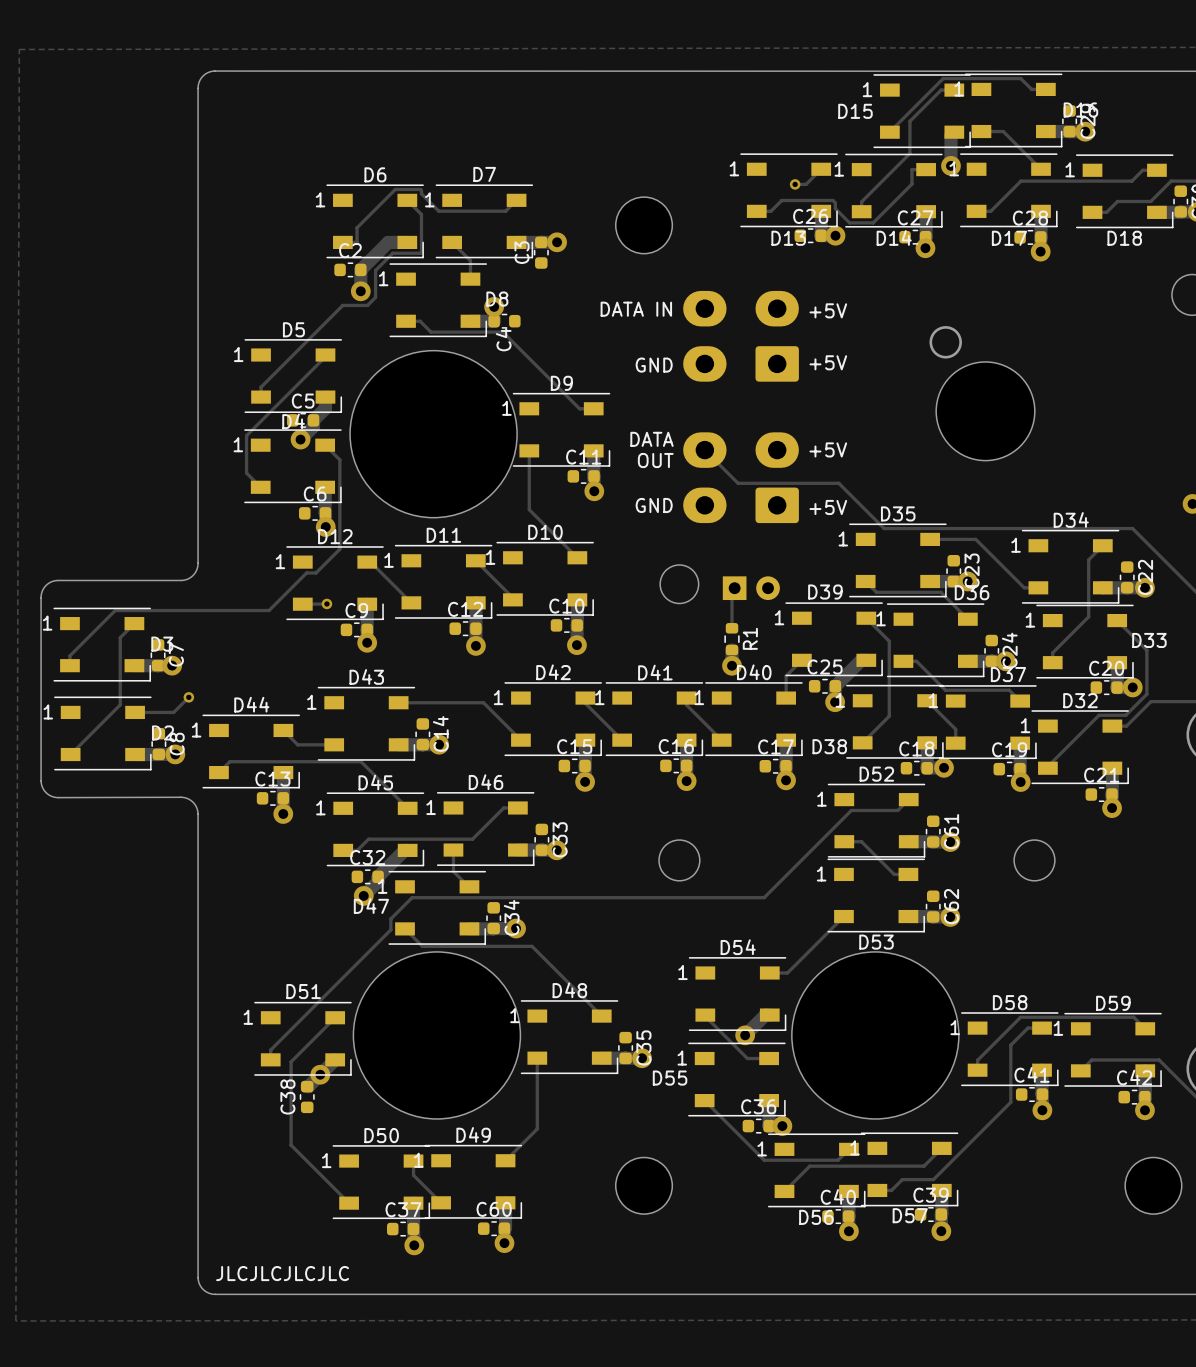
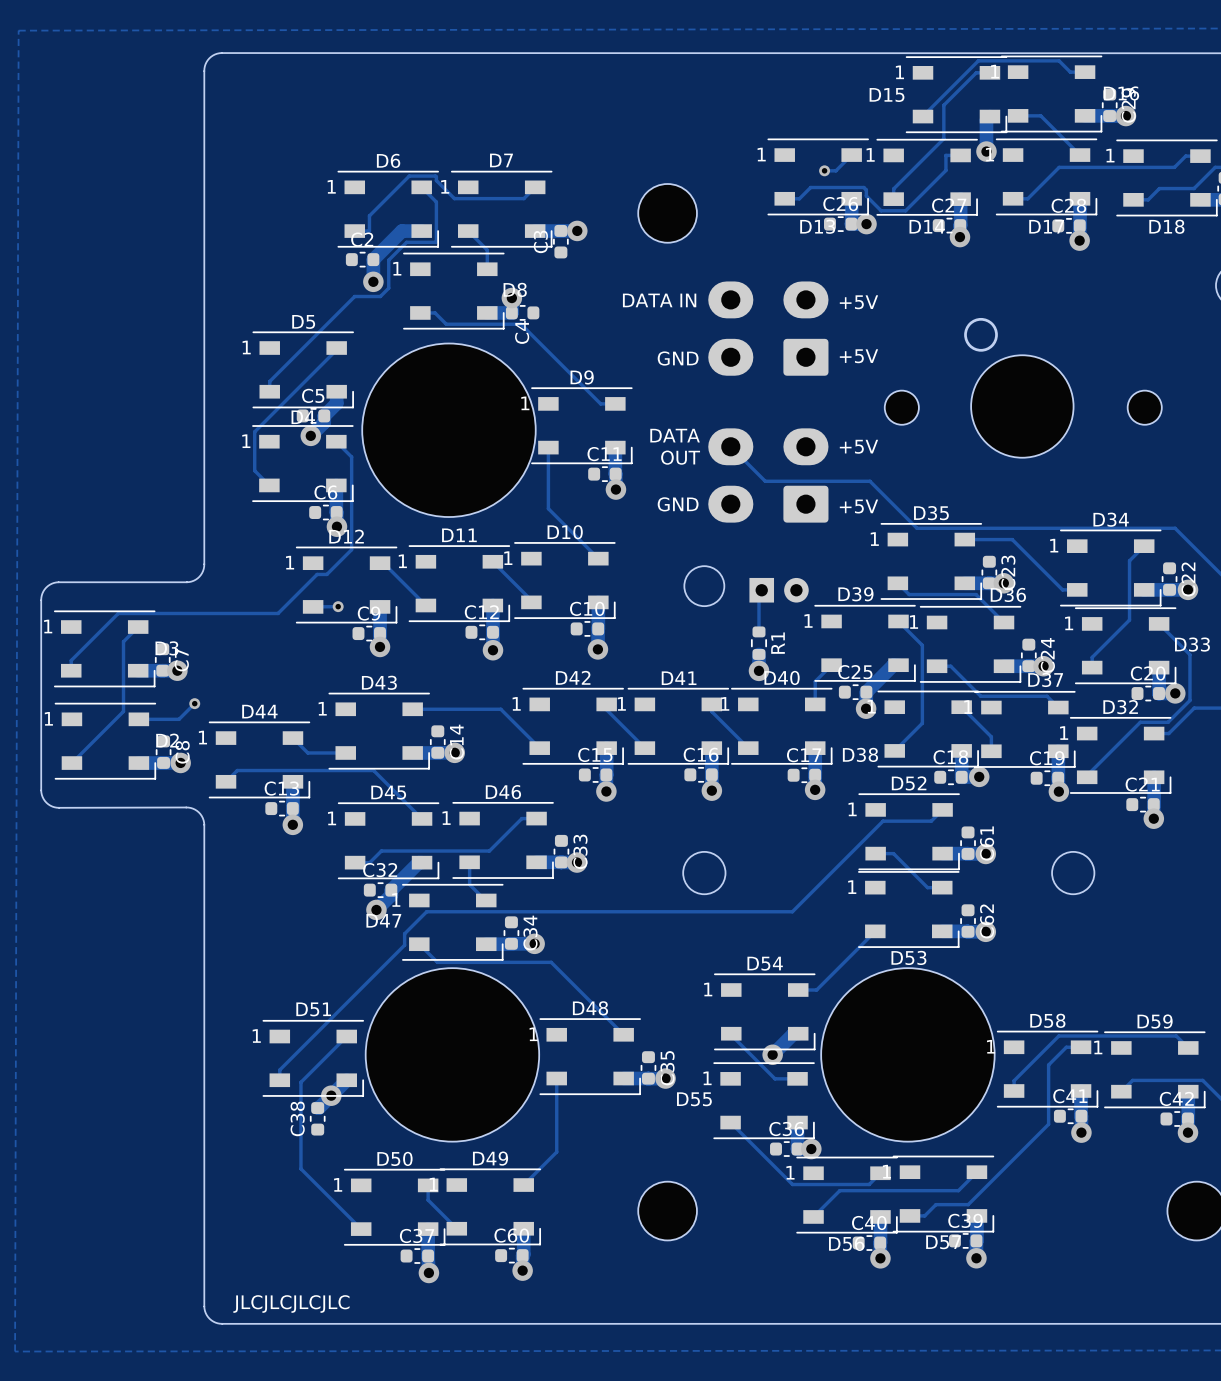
part: none -> (901, 407)
part: none -> (1144, 407)

